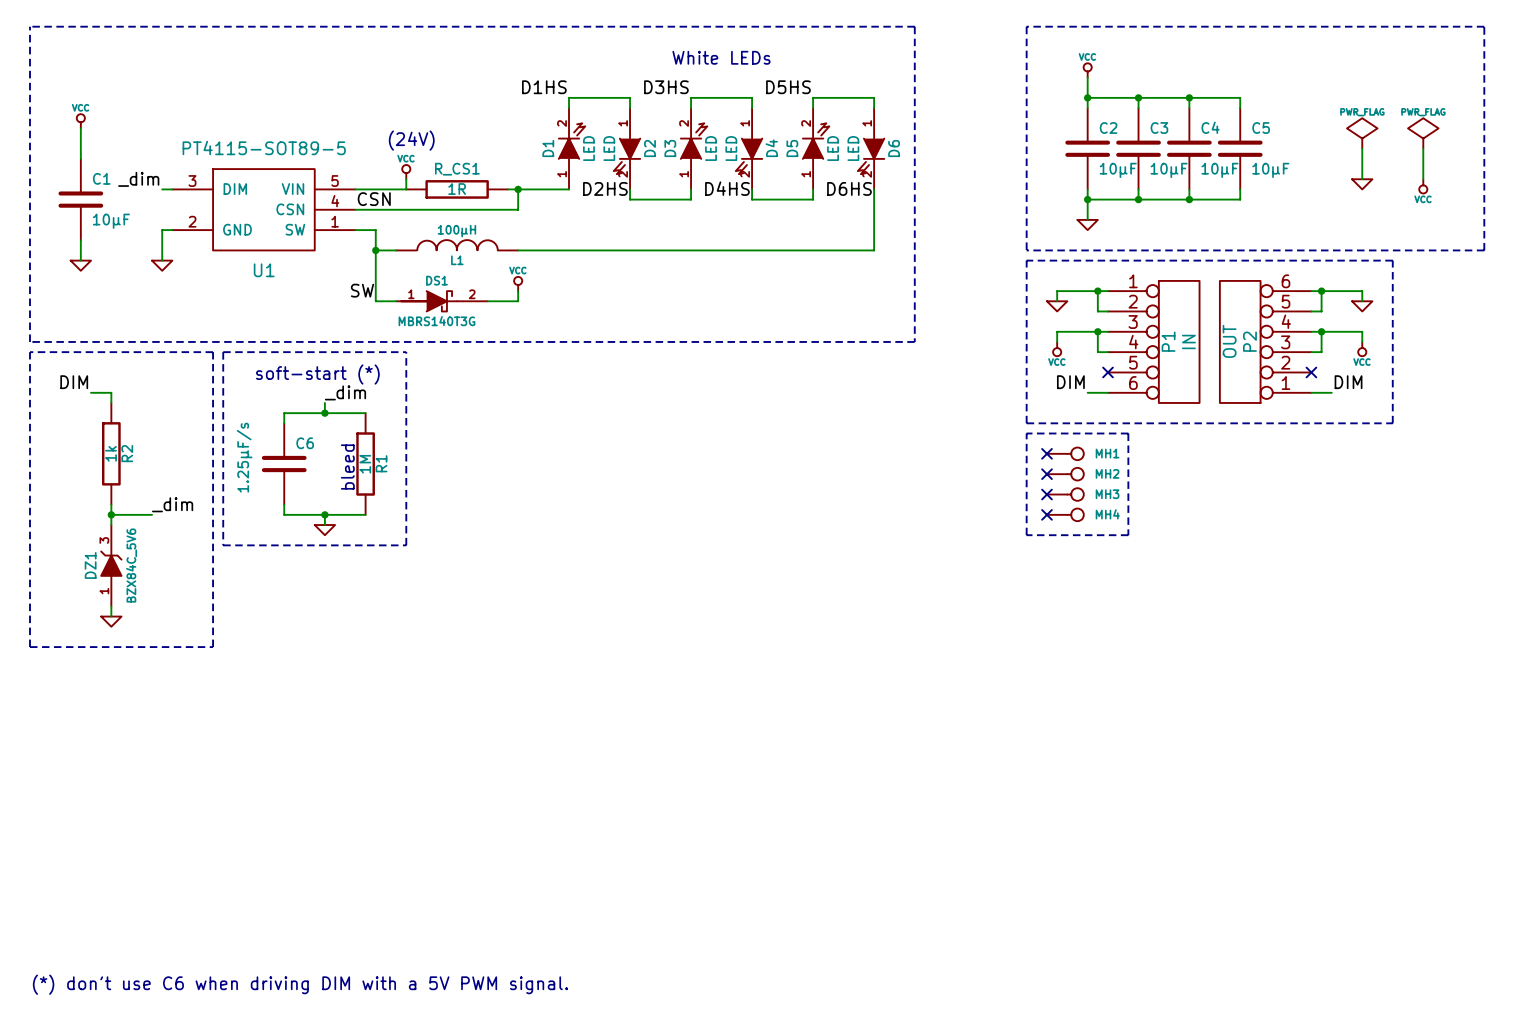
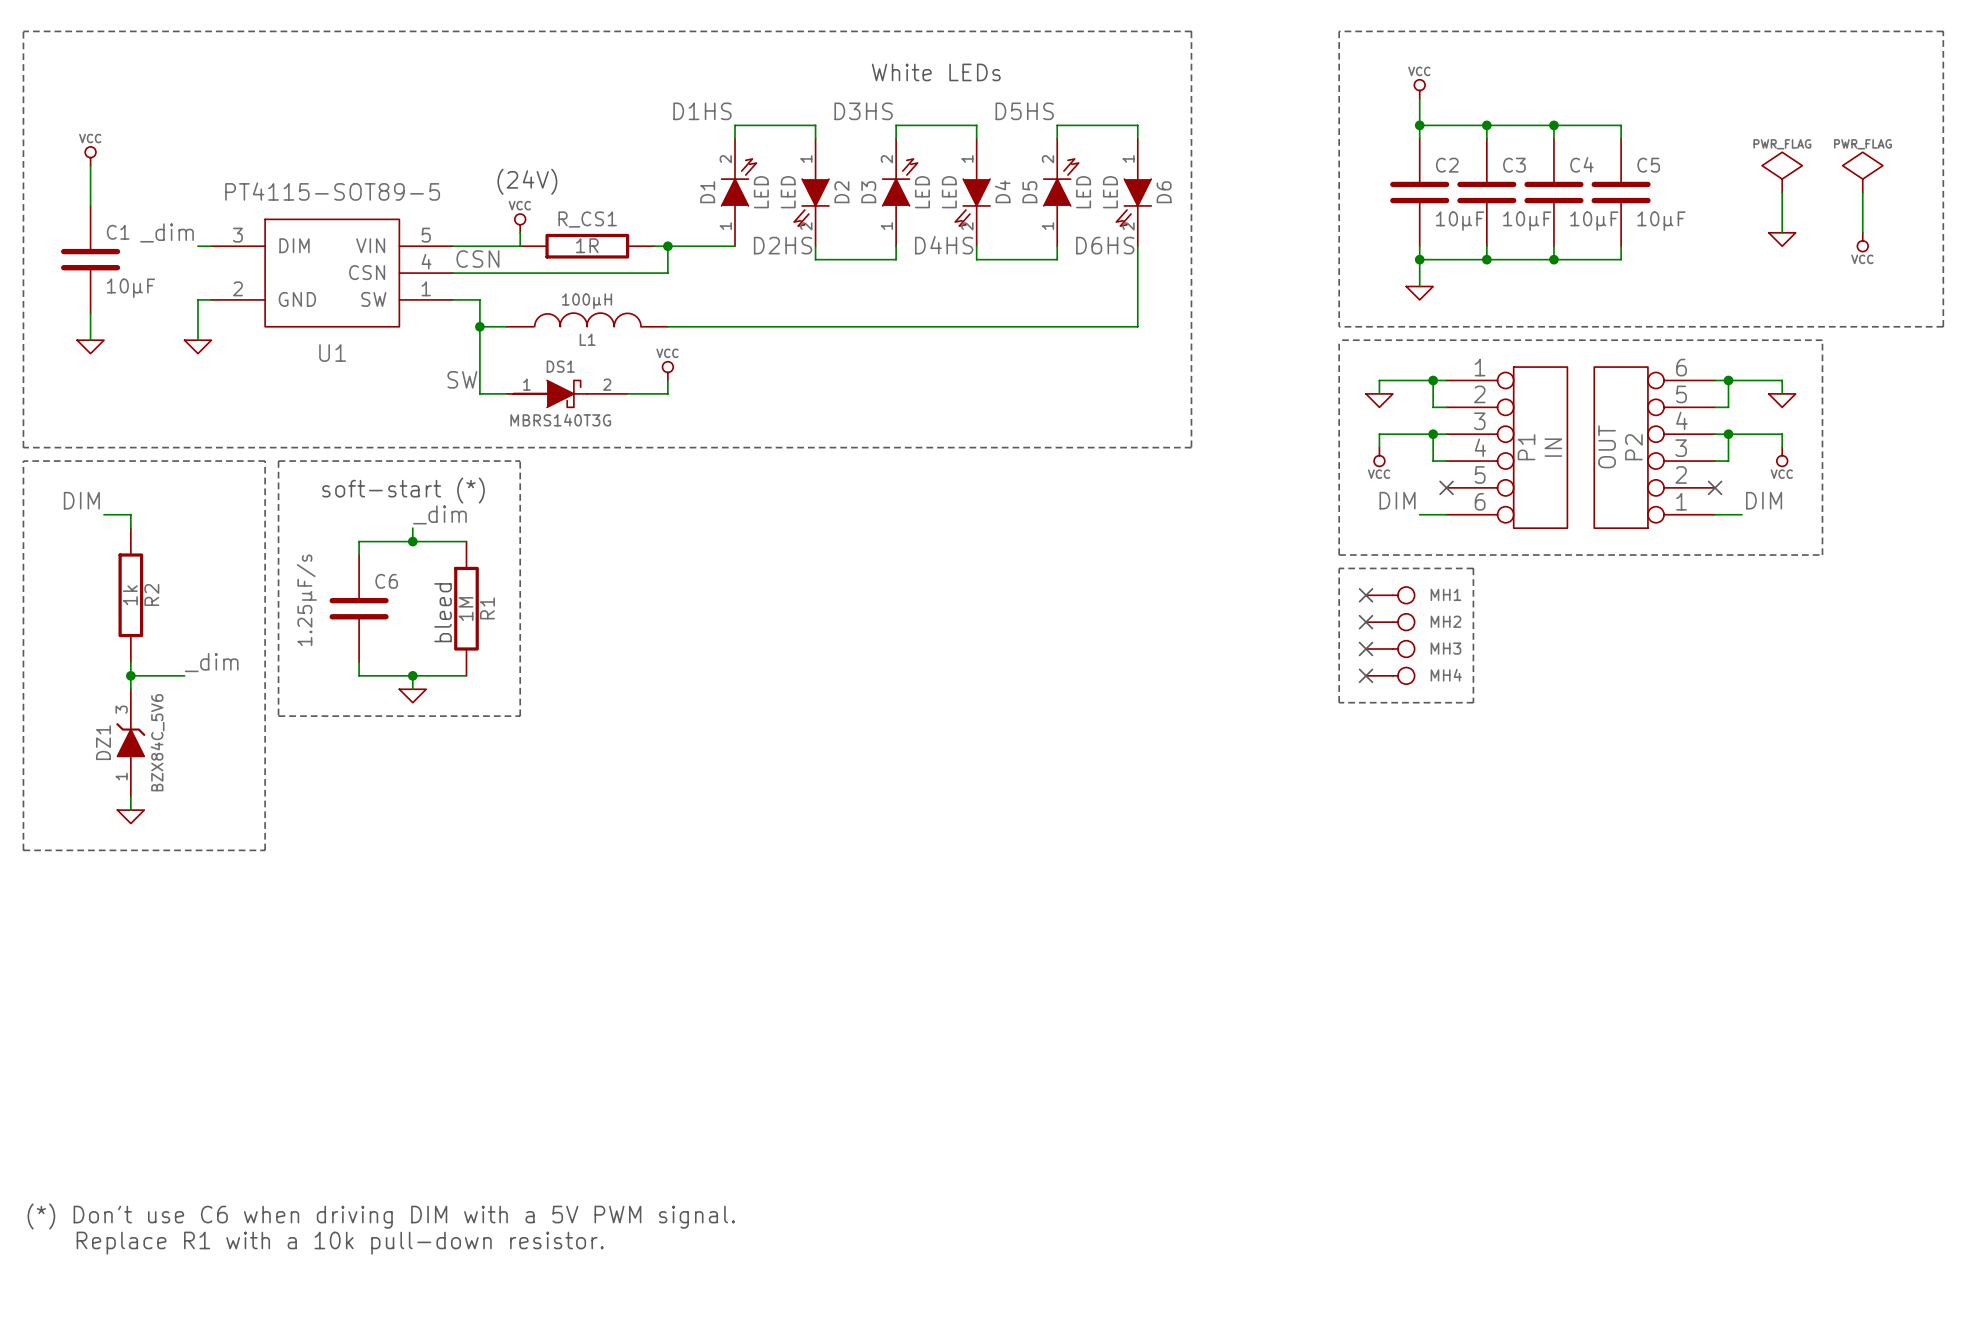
text: none -> (*) Don't use C6 when driving DIM with a 5V PWM signal. (381, 1216)
text: none -> Replace R1 with a 10k pull-down resistor. (340, 1243)
text: (*) don't use C6 when driving DIM with a 5V PWM signal. (300, 984) -> none

